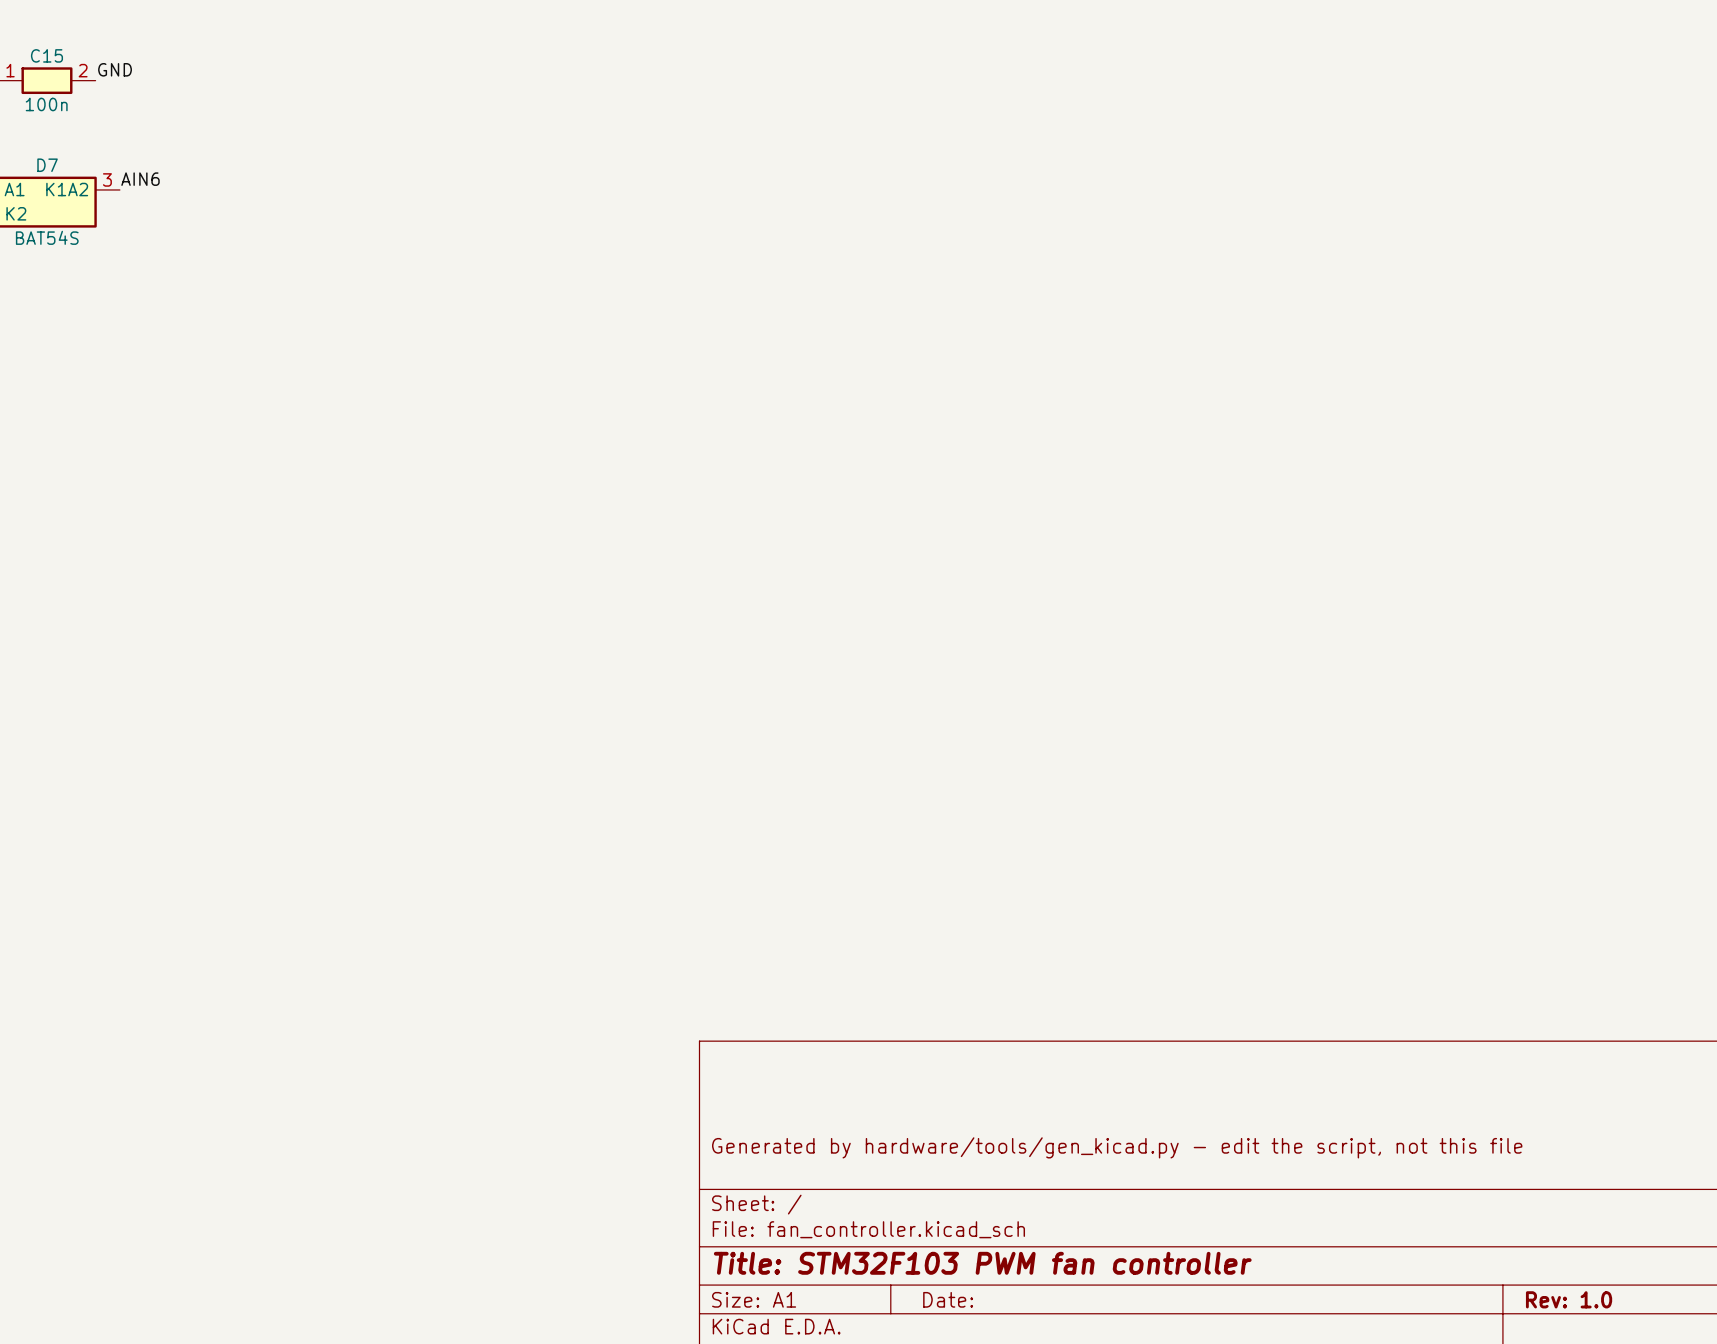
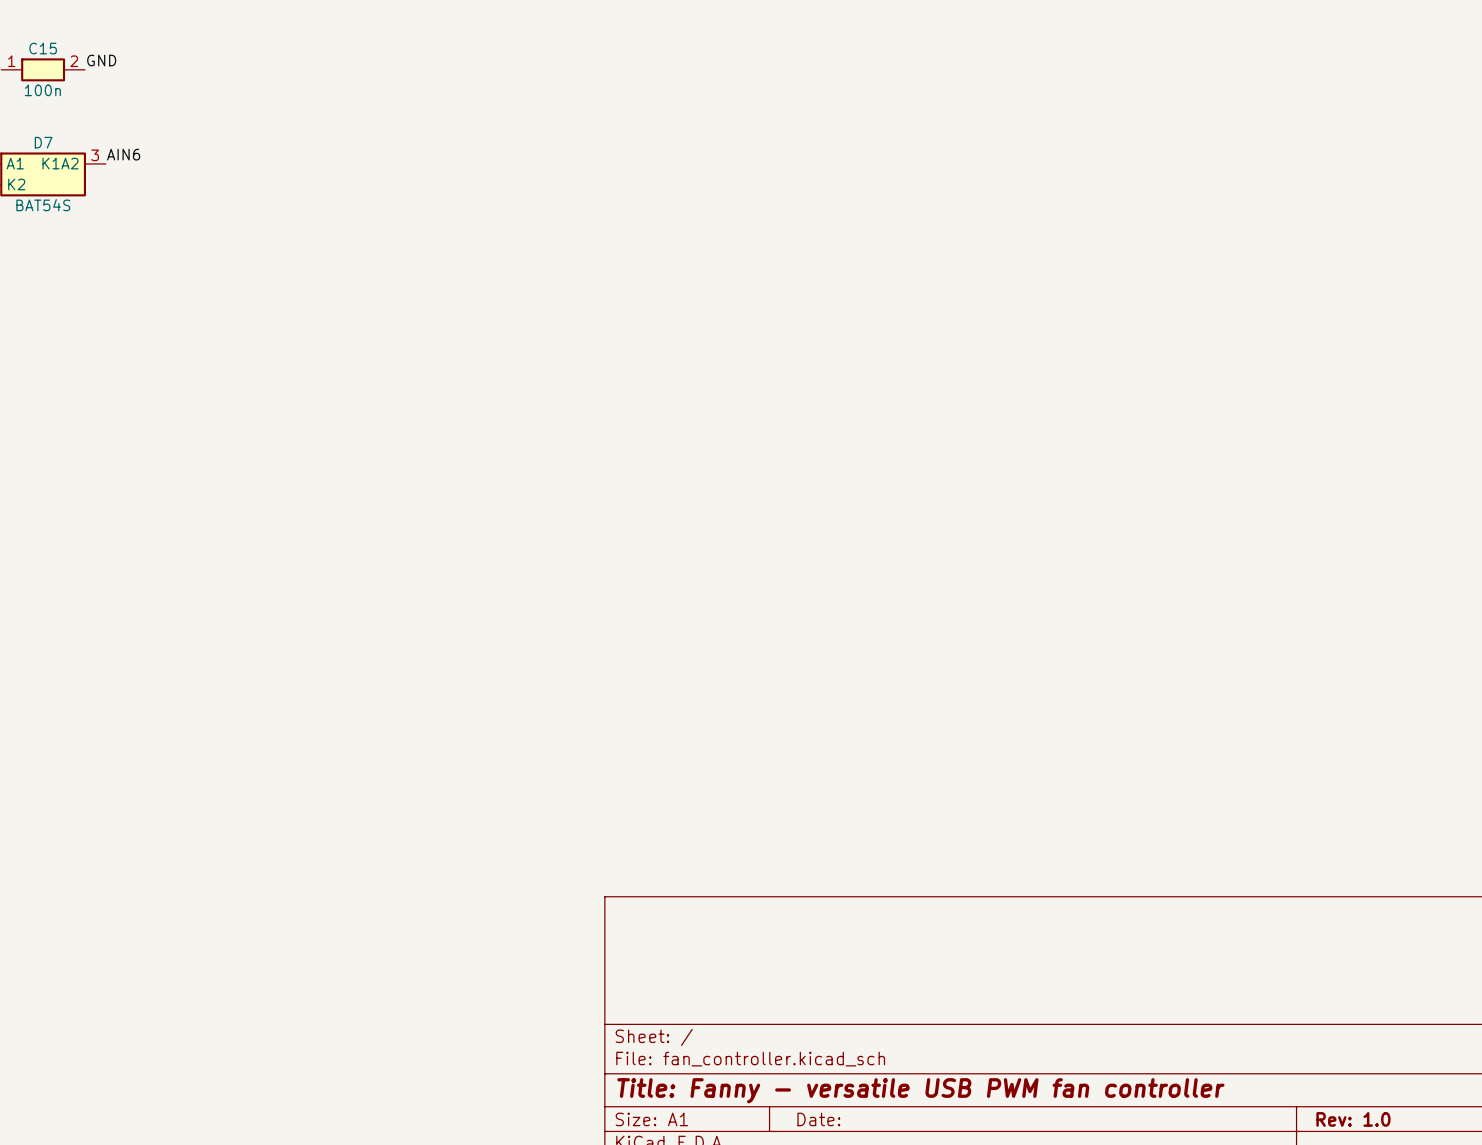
title block: Generated by hardware/tools/gen_kicad.py - edit the script, not this file (1117, 1147) -> none
title block: Title: STM32F103 PWM fan controller (982, 1263) -> Title: Fanny - versatile USB PWM fan controller (920, 1090)

